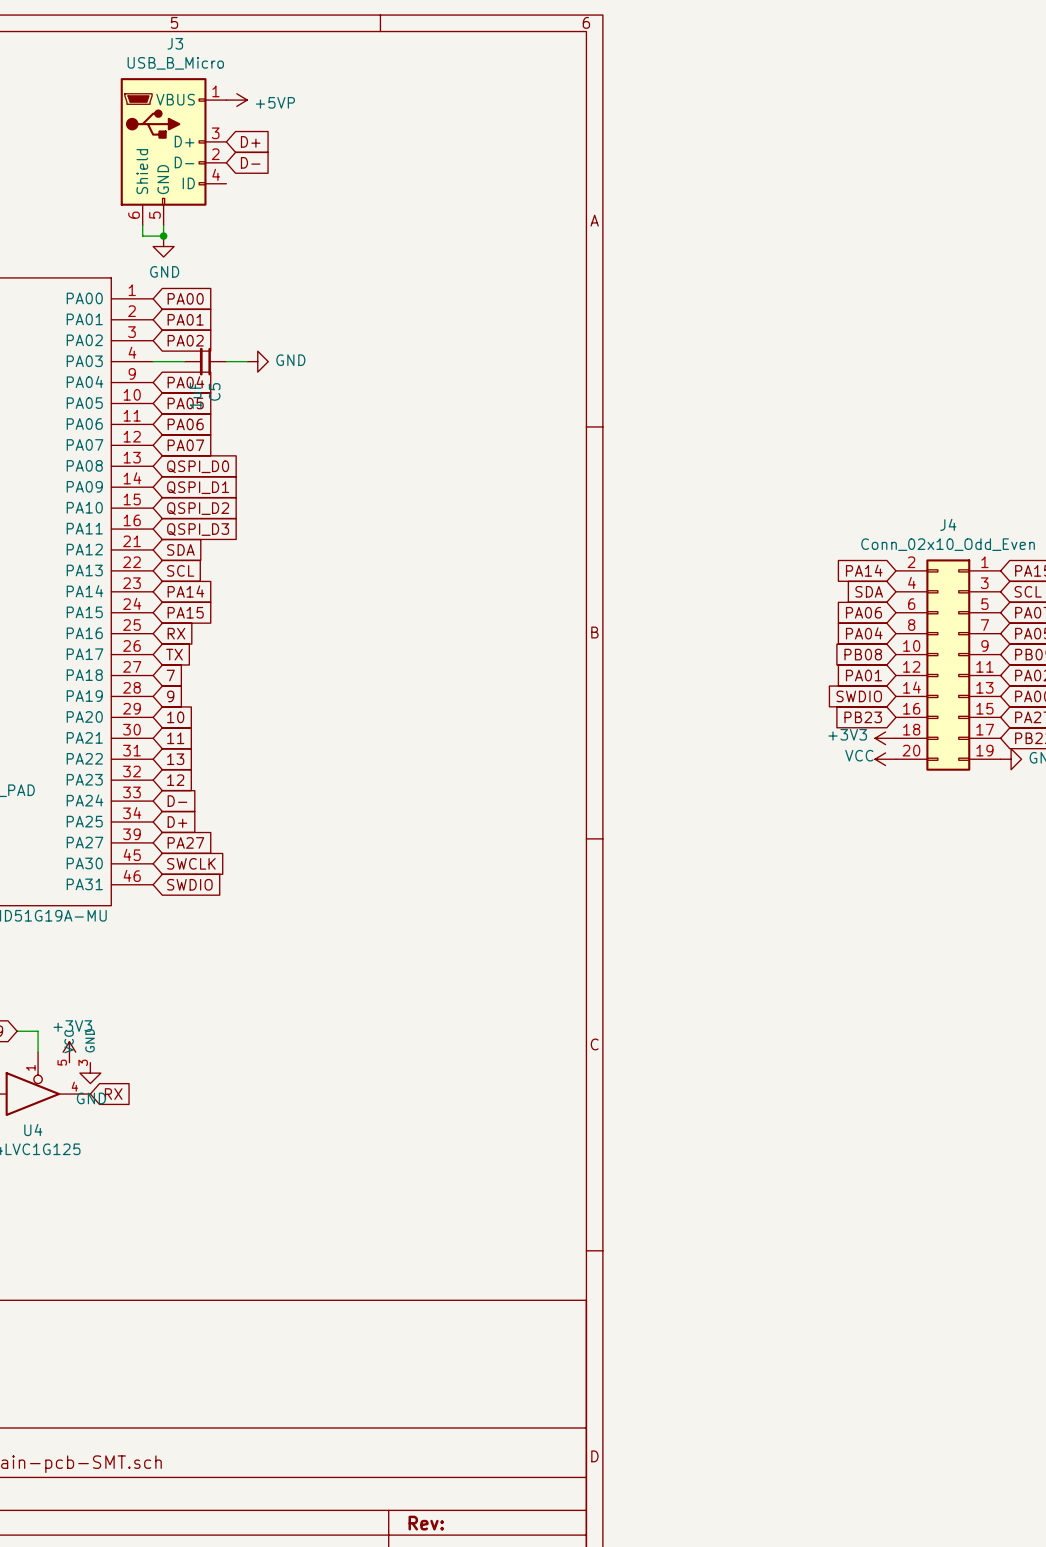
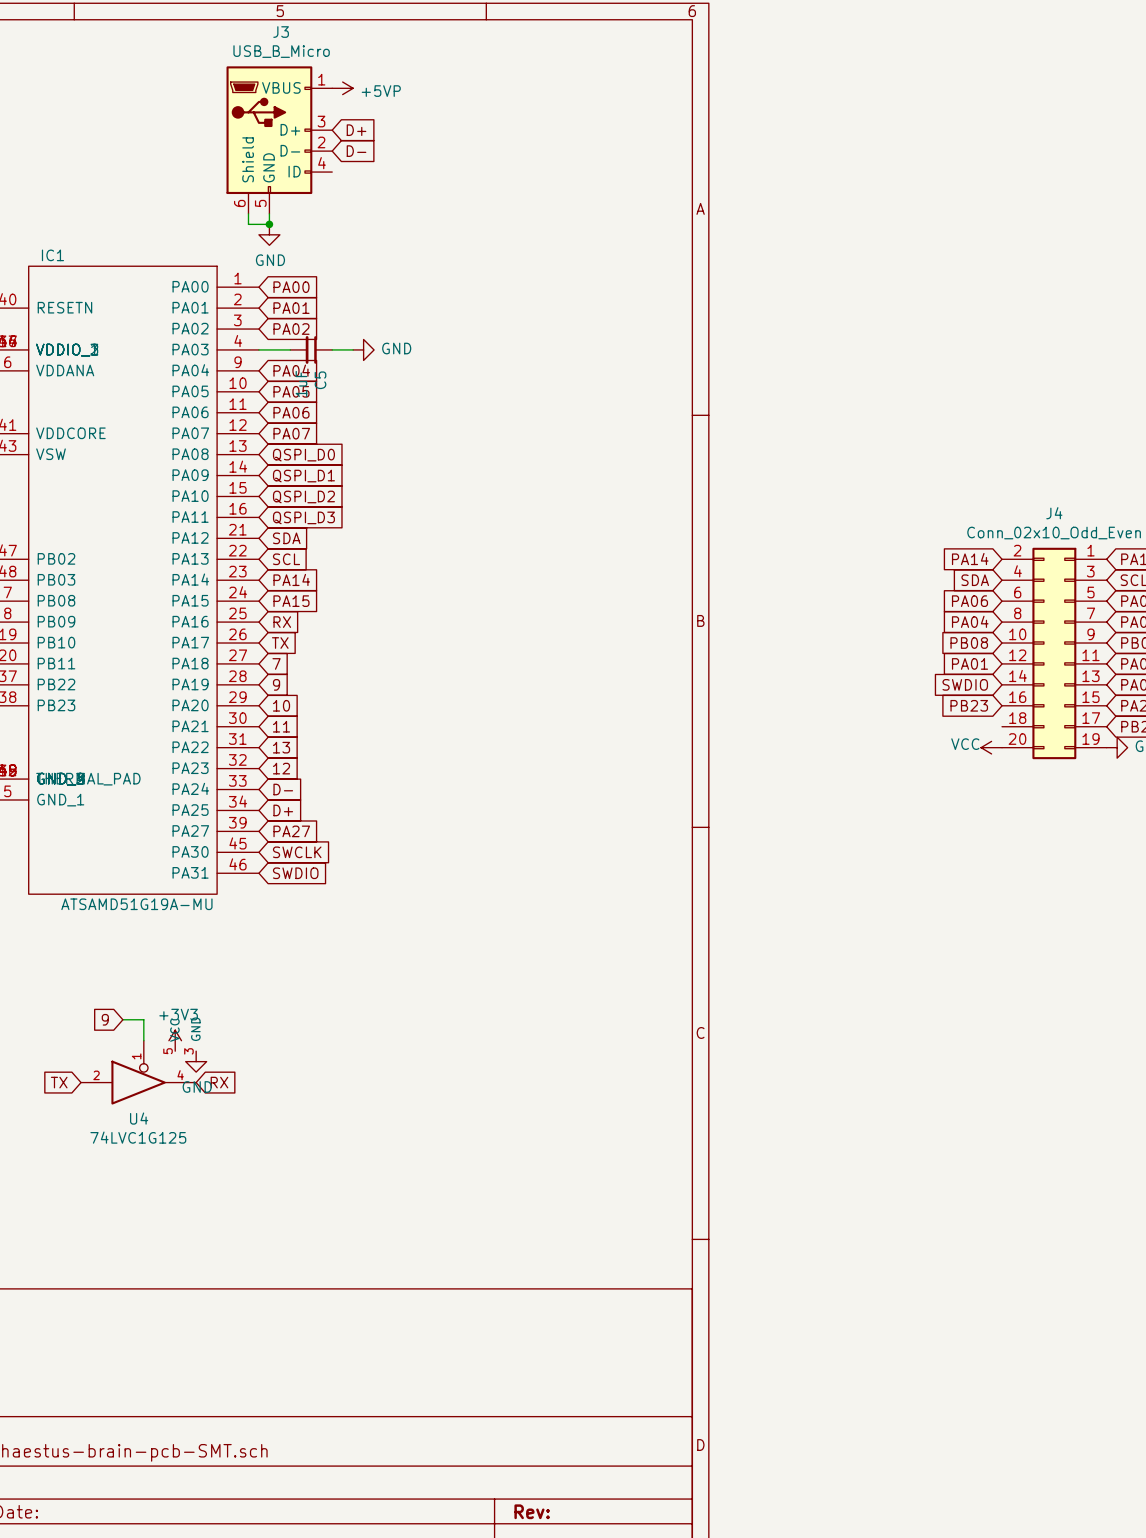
power symbol: +3V3 (885, 738) -> none

